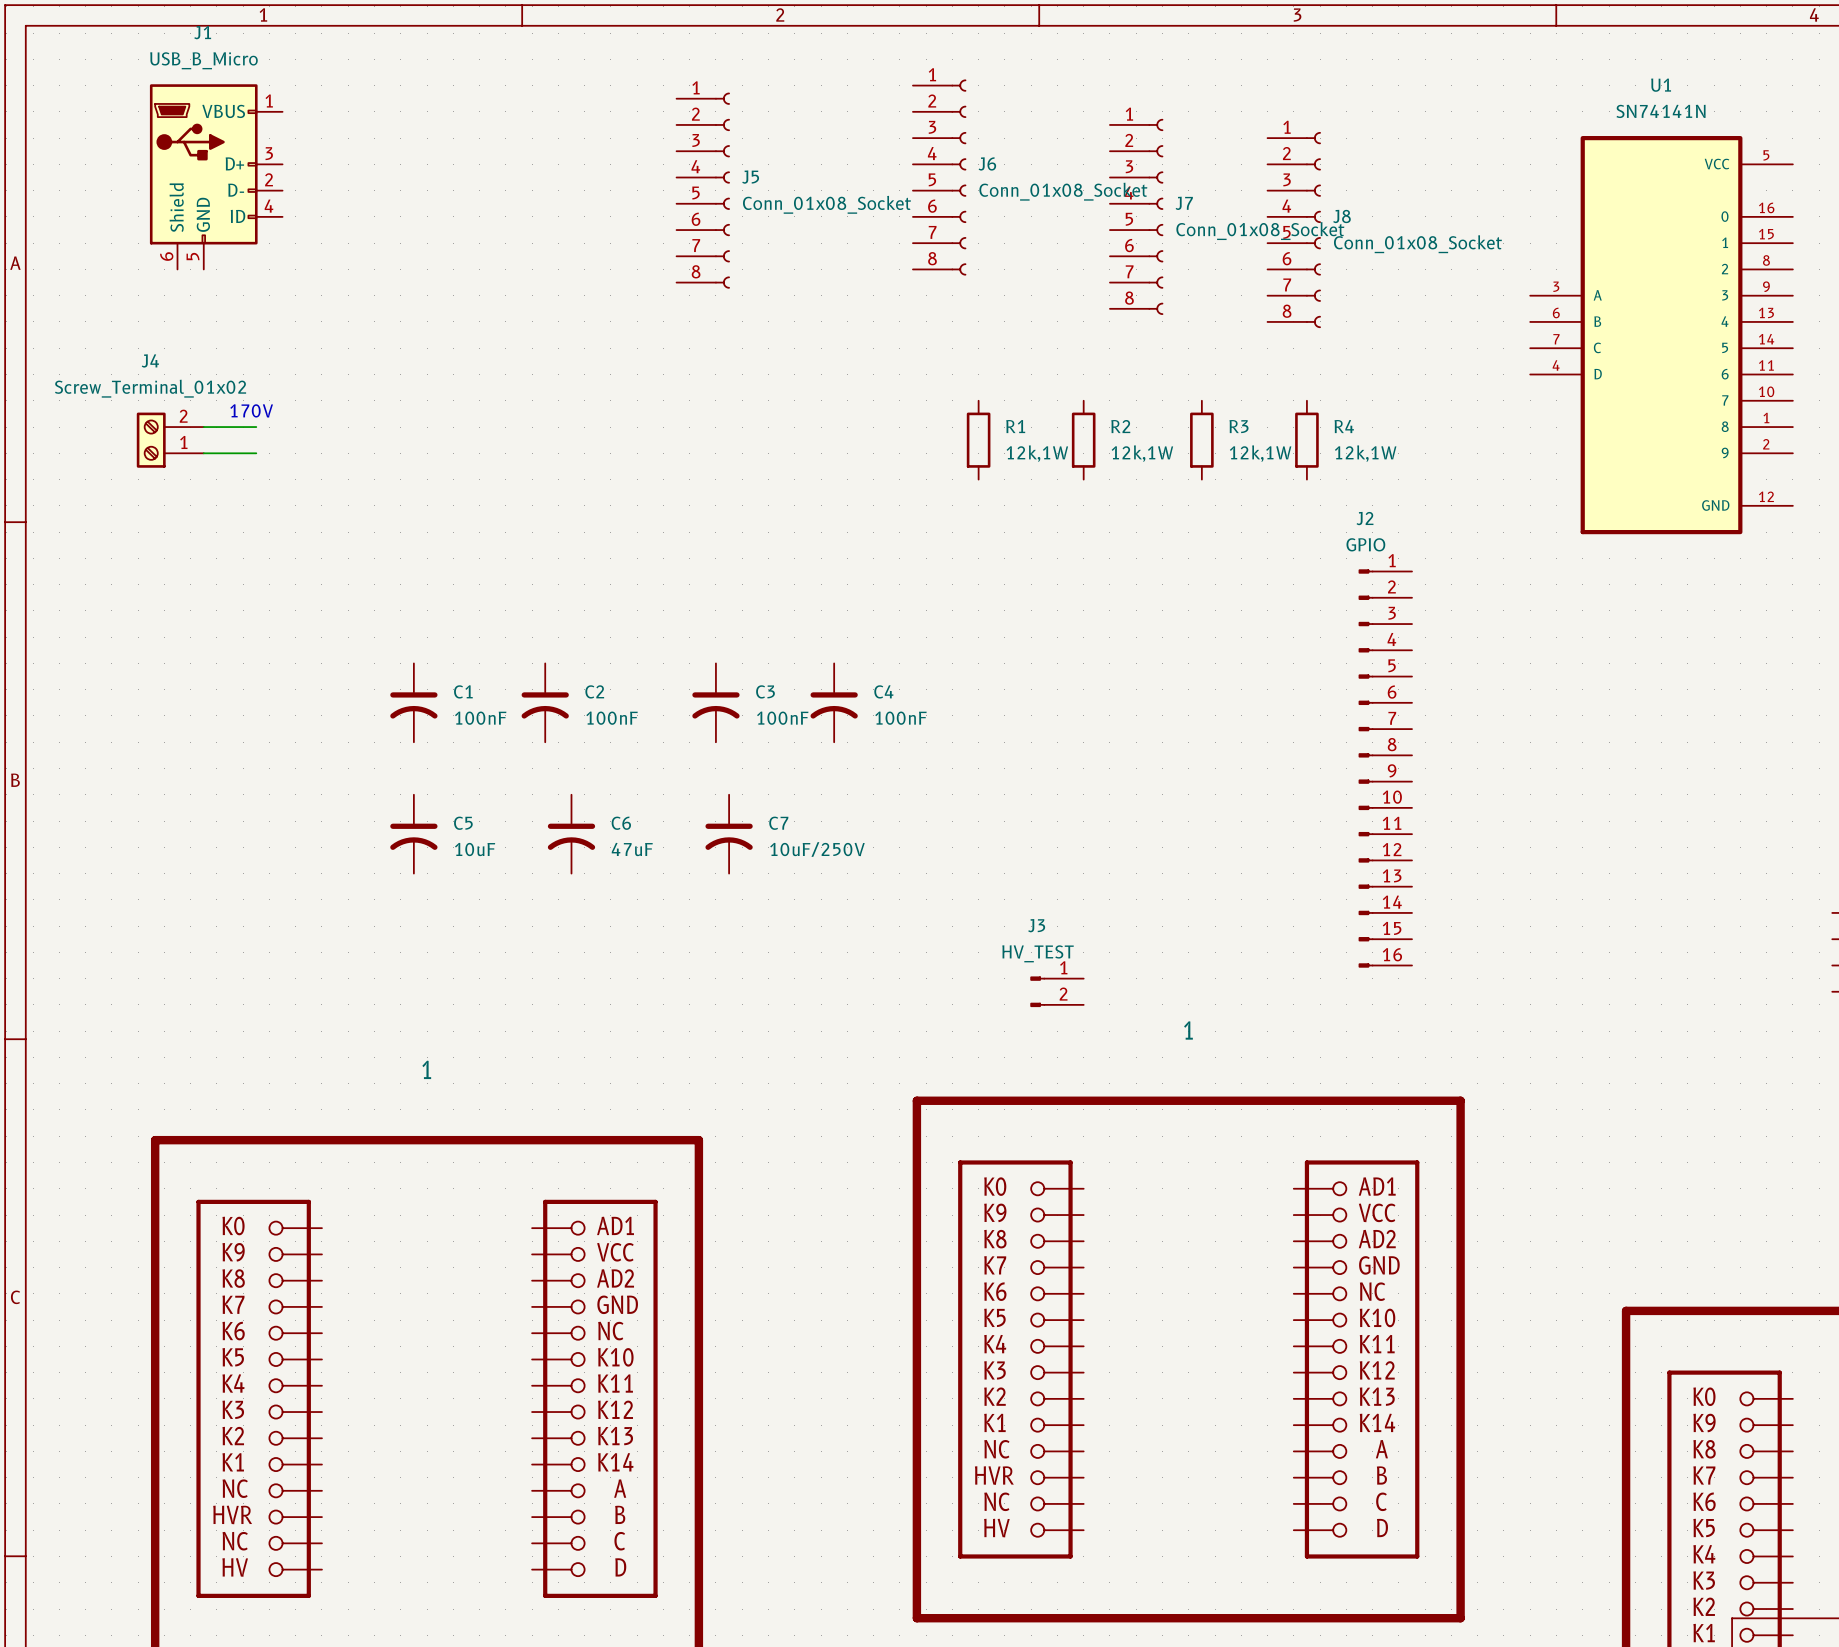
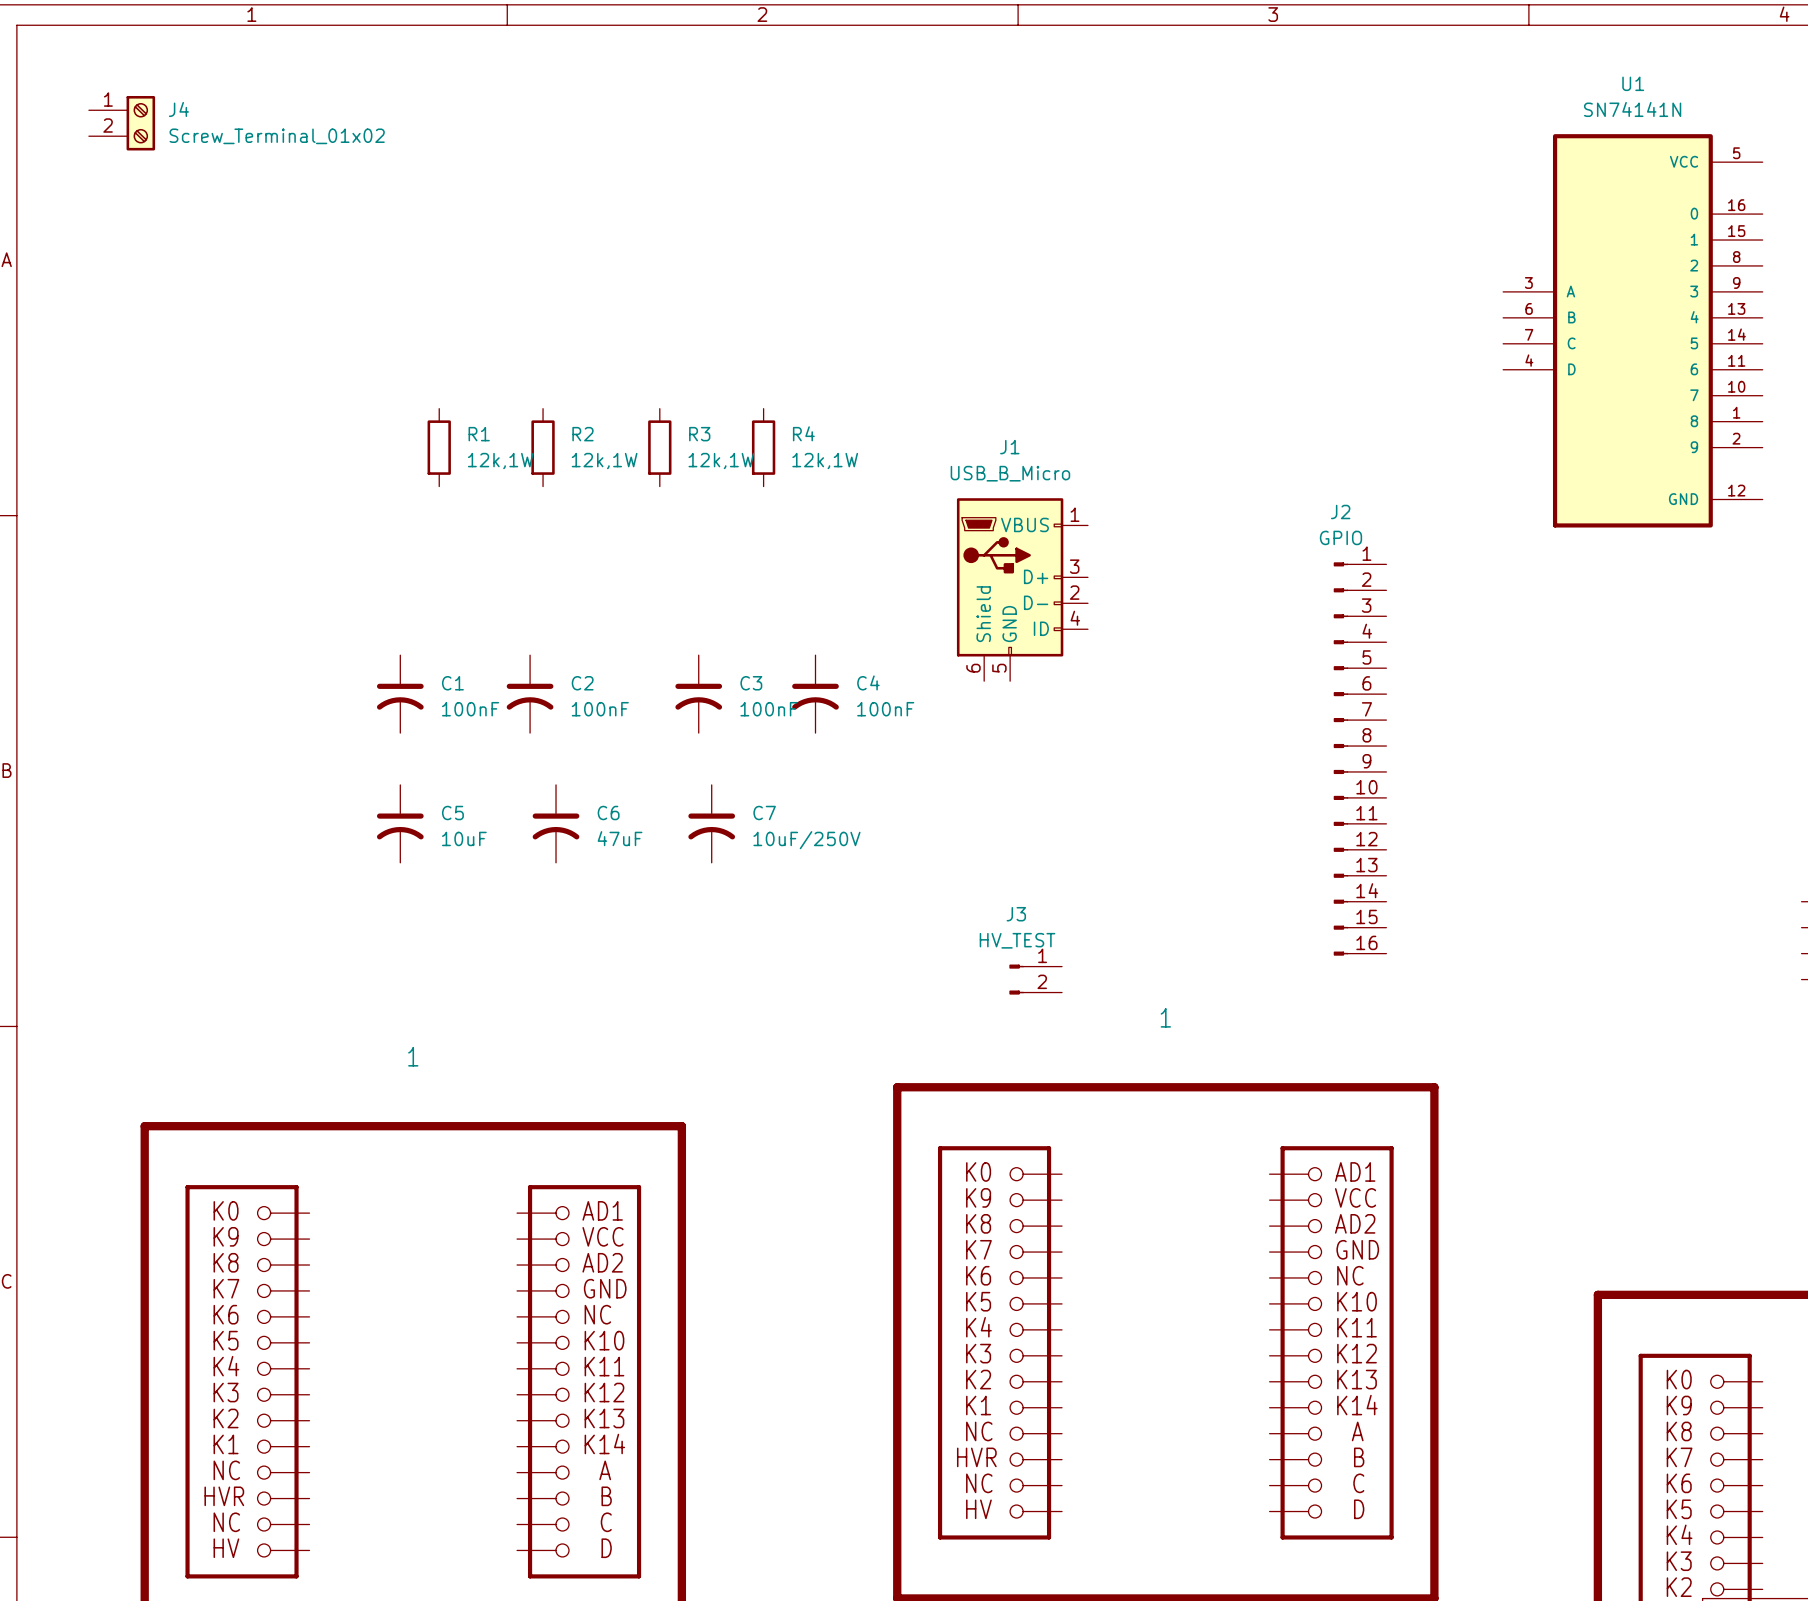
J1 position: (216, 176) -> (1022, 589)
J6: Conn_01x08_Socket (939, 177) -> none
J5: Conn_01x08_Socket (703, 190) -> none
J7: Conn_01x08_Socket (1136, 216) -> none
J8: Conn_01x08_Socket (1294, 230) -> none
J4 name position: J4 (150, 360) -> J4 (178, 109)
J4 value position: Screw_Terminal_01x02 (150, 388) -> Screw_Terminal_01x02 (277, 136)
text: 170V (251, 410) -> none
wire: (203, 427) (256, 427) -> none
J4 rotation: 0° (151, 440) -> 180° (140, 123)
J4 position: (170, 440) -> (122, 123)
R1 position: (978, 440) -> (439, 447)
R2 position: (1083, 440) -> (543, 447)
R3 position: (1201, 440) -> (659, 447)
R4 position: (1306, 440) -> (763, 447)
wire: (203, 453) (256, 453) -> none

